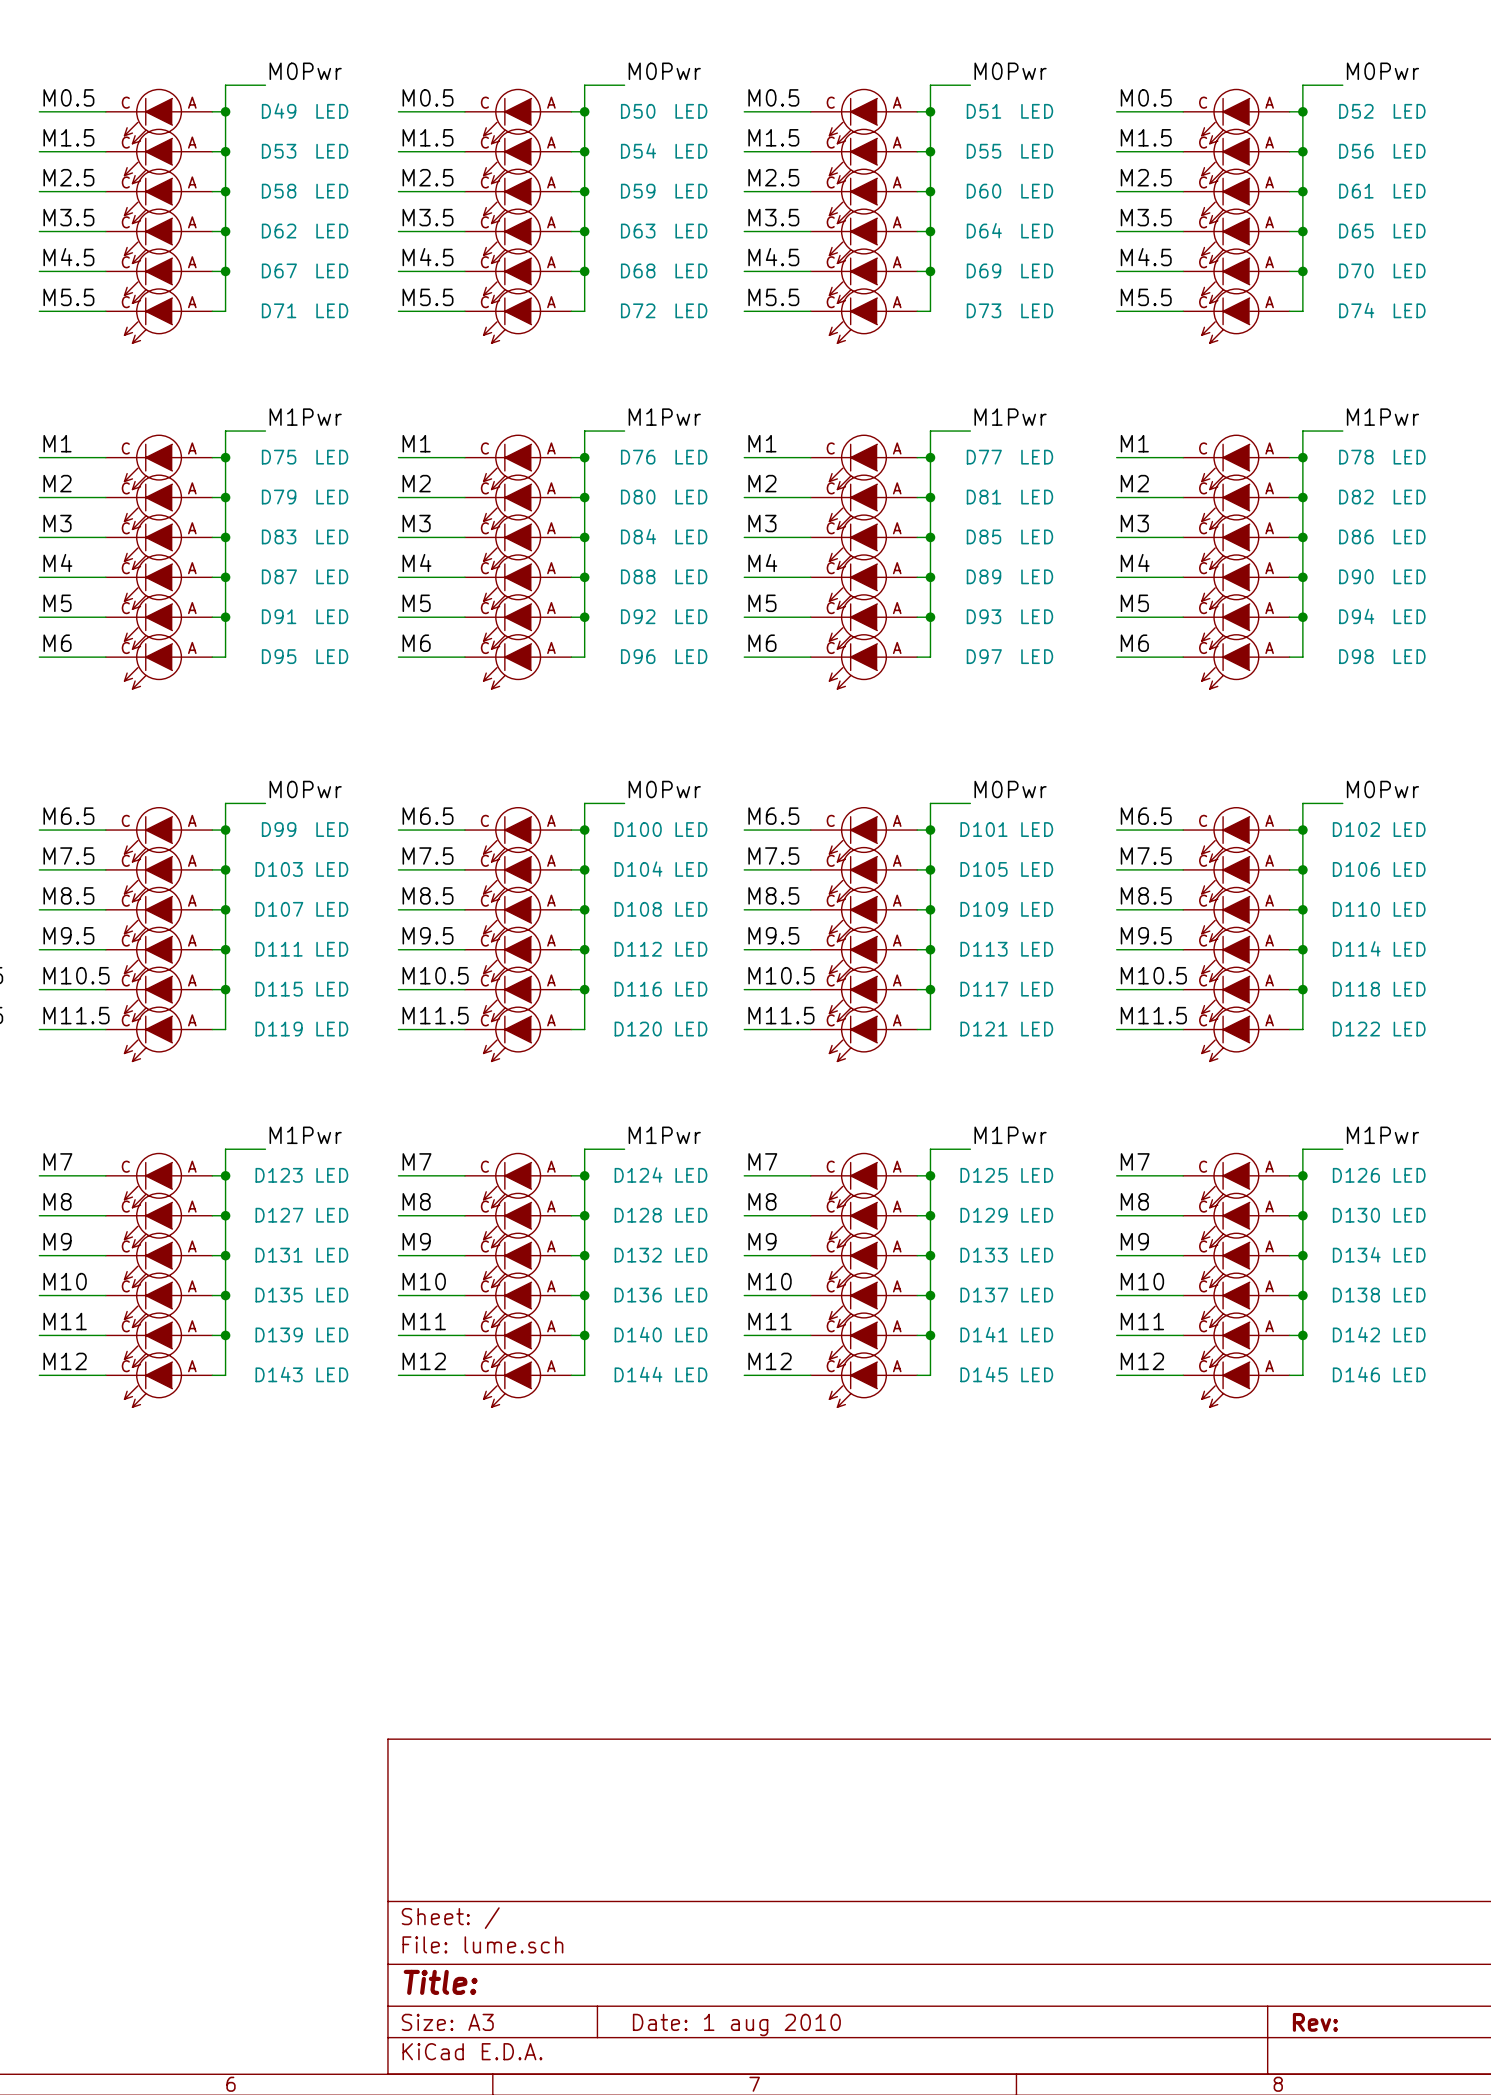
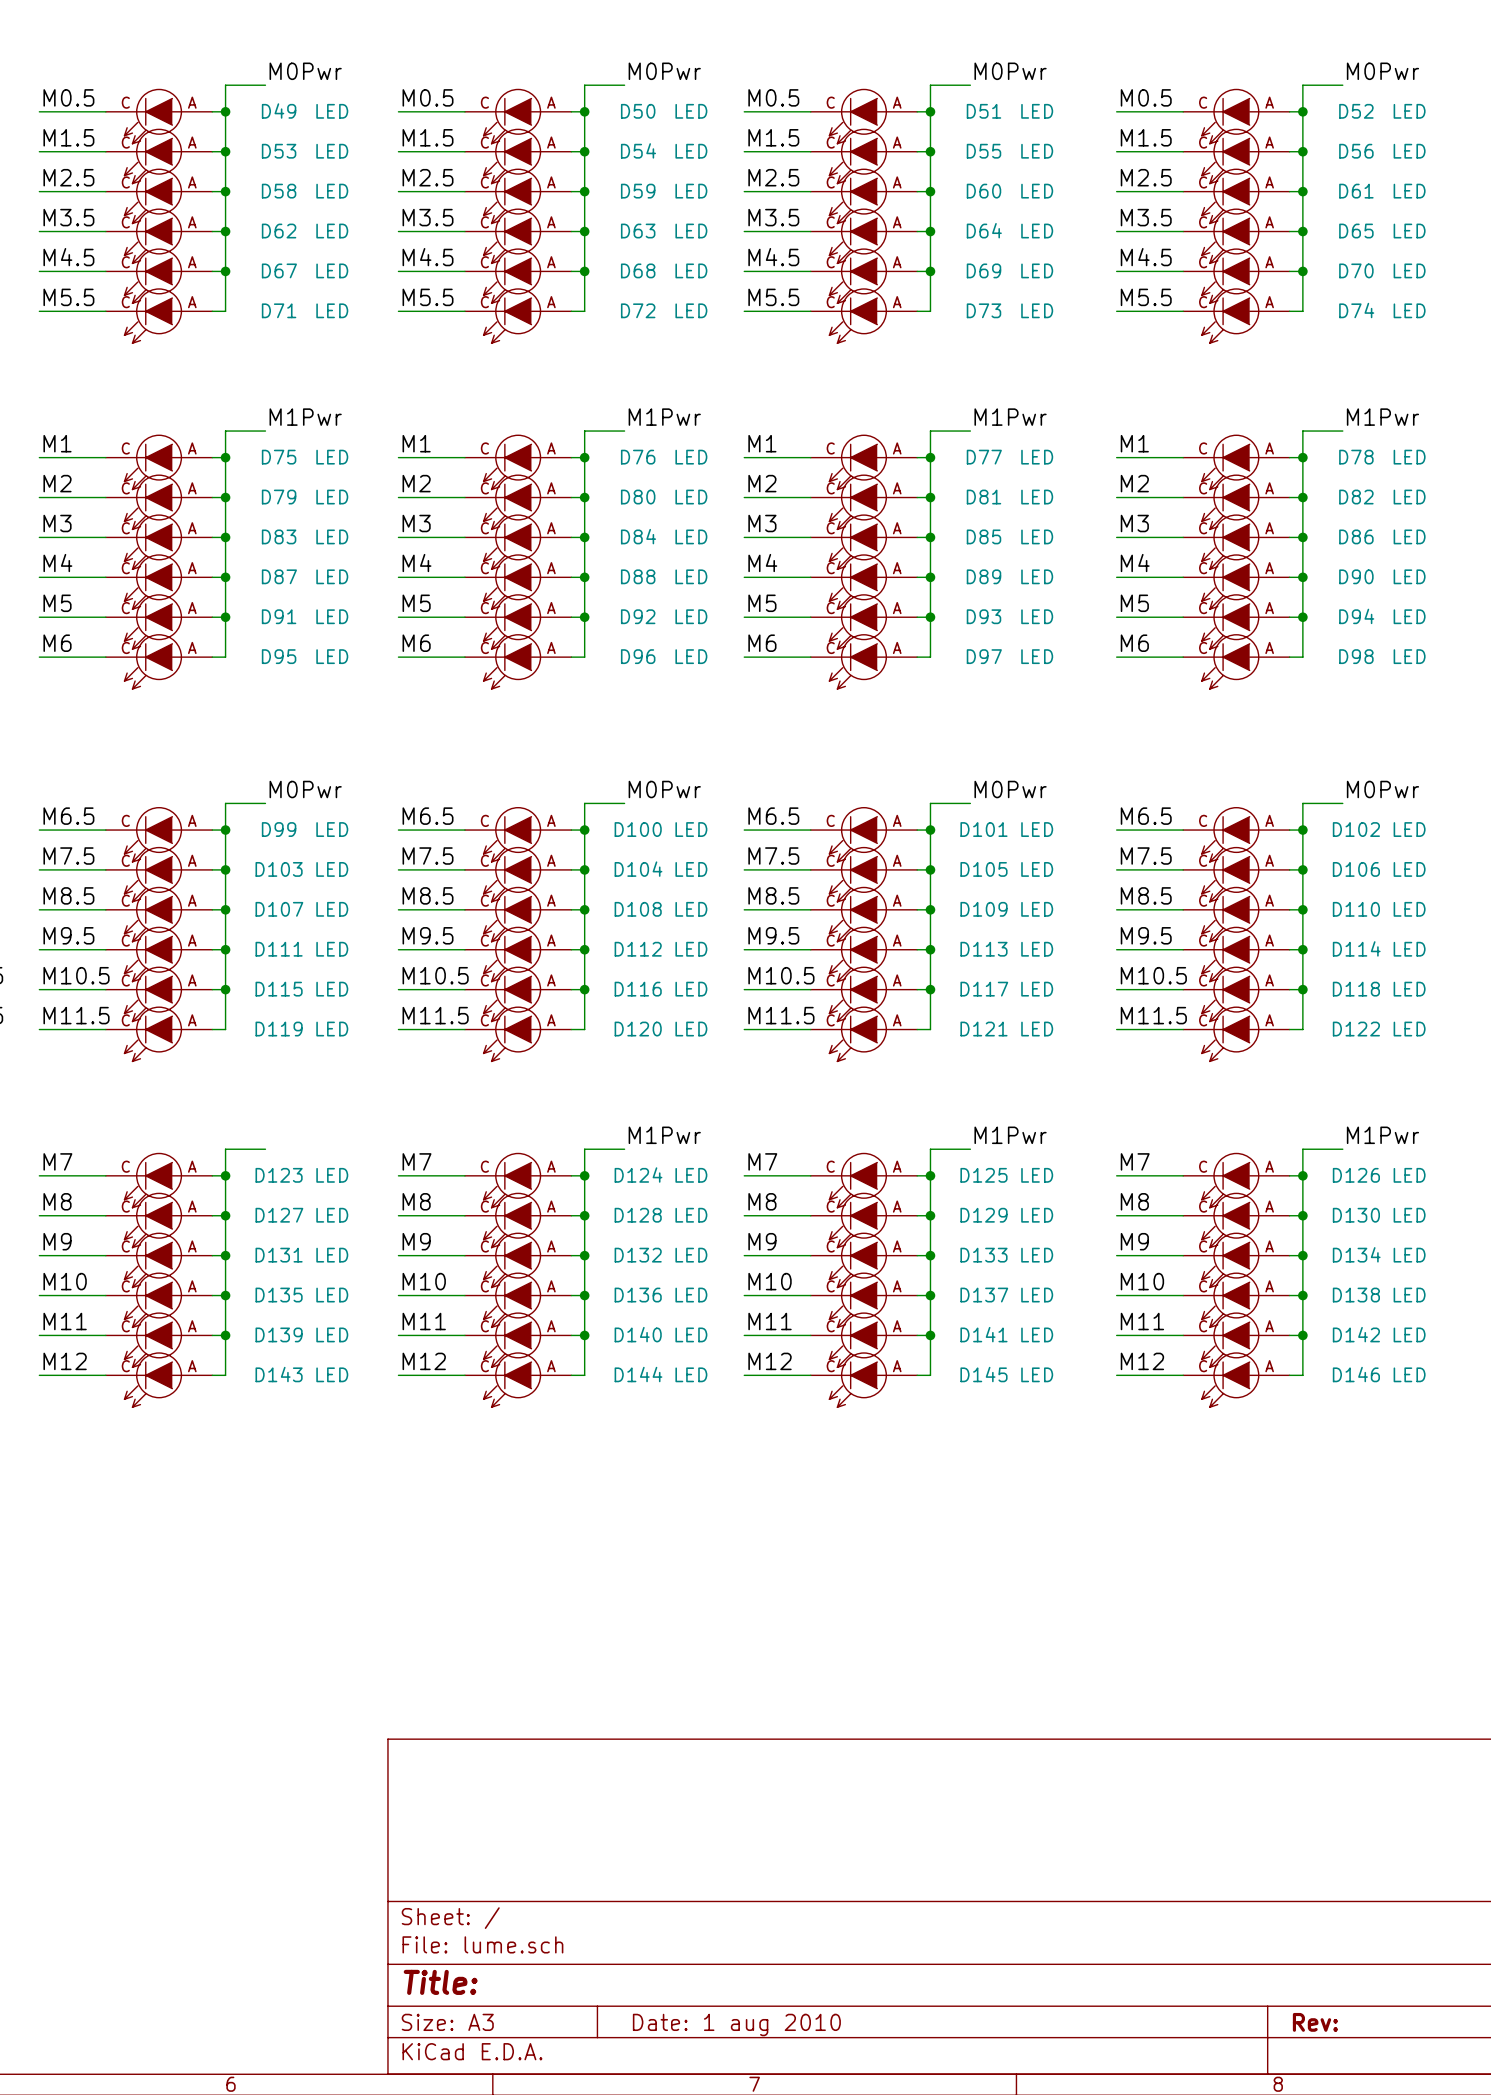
label: M1Pwr (305, 1135) -> none

